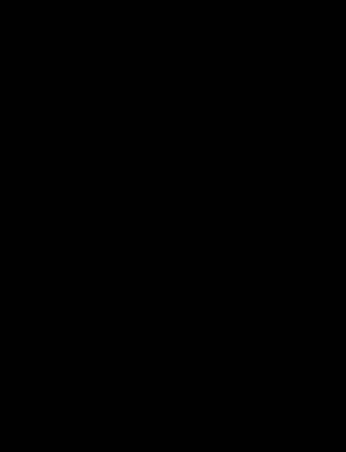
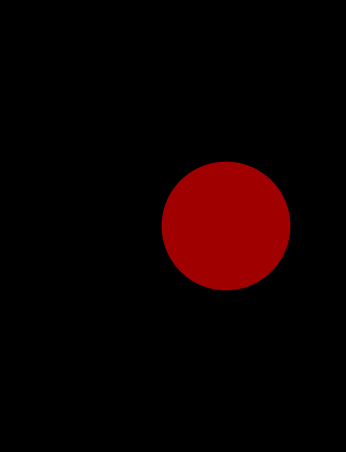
part: none -> (226, 226)

